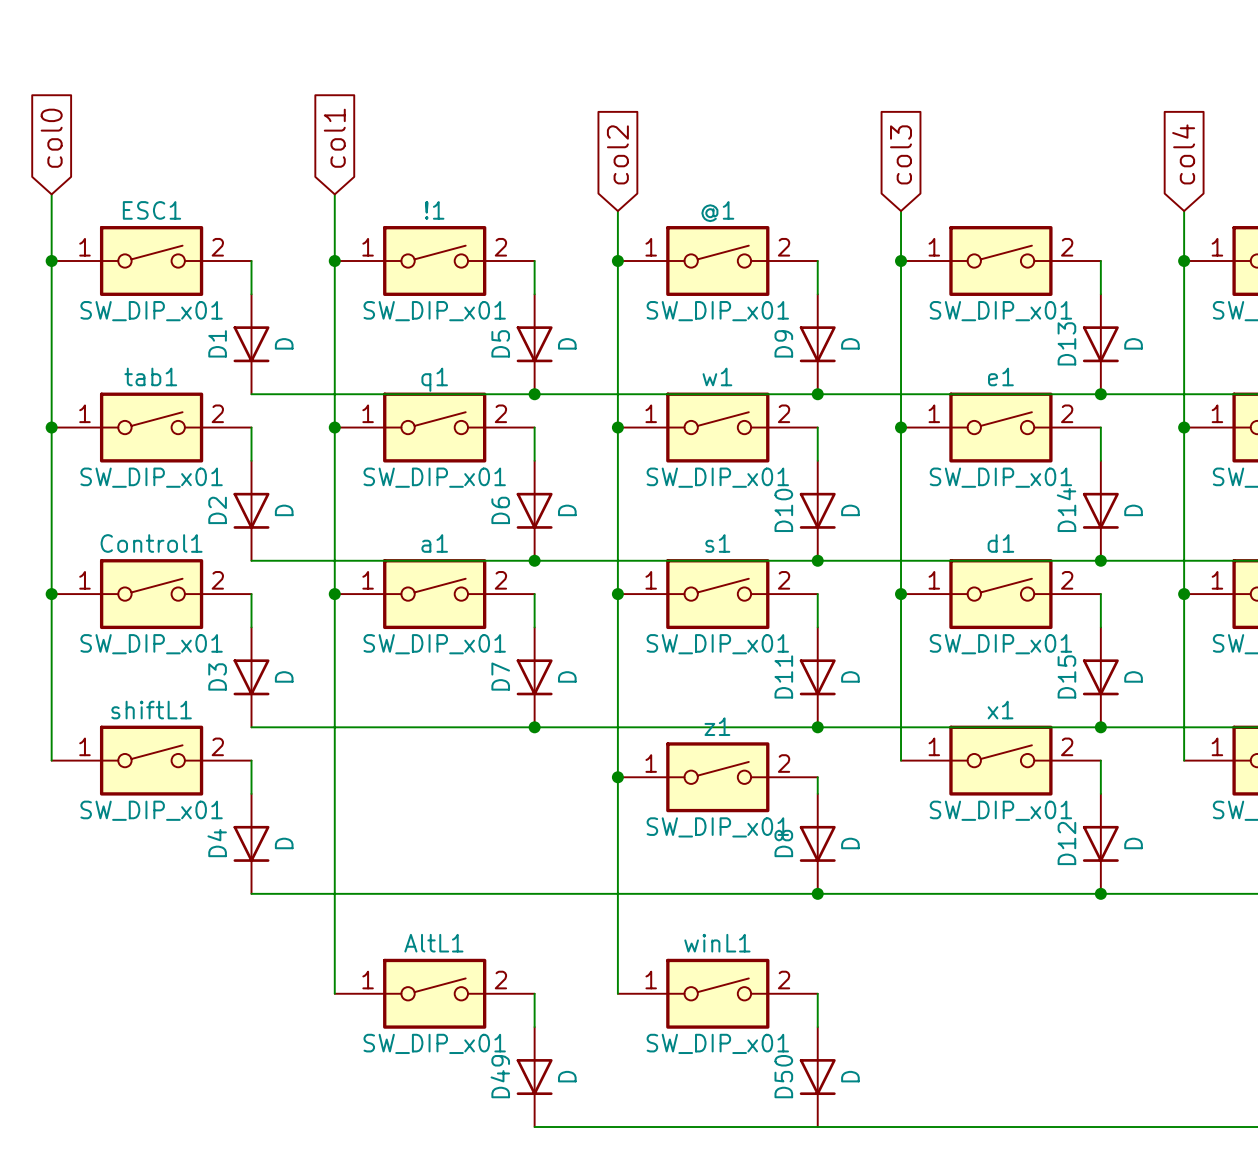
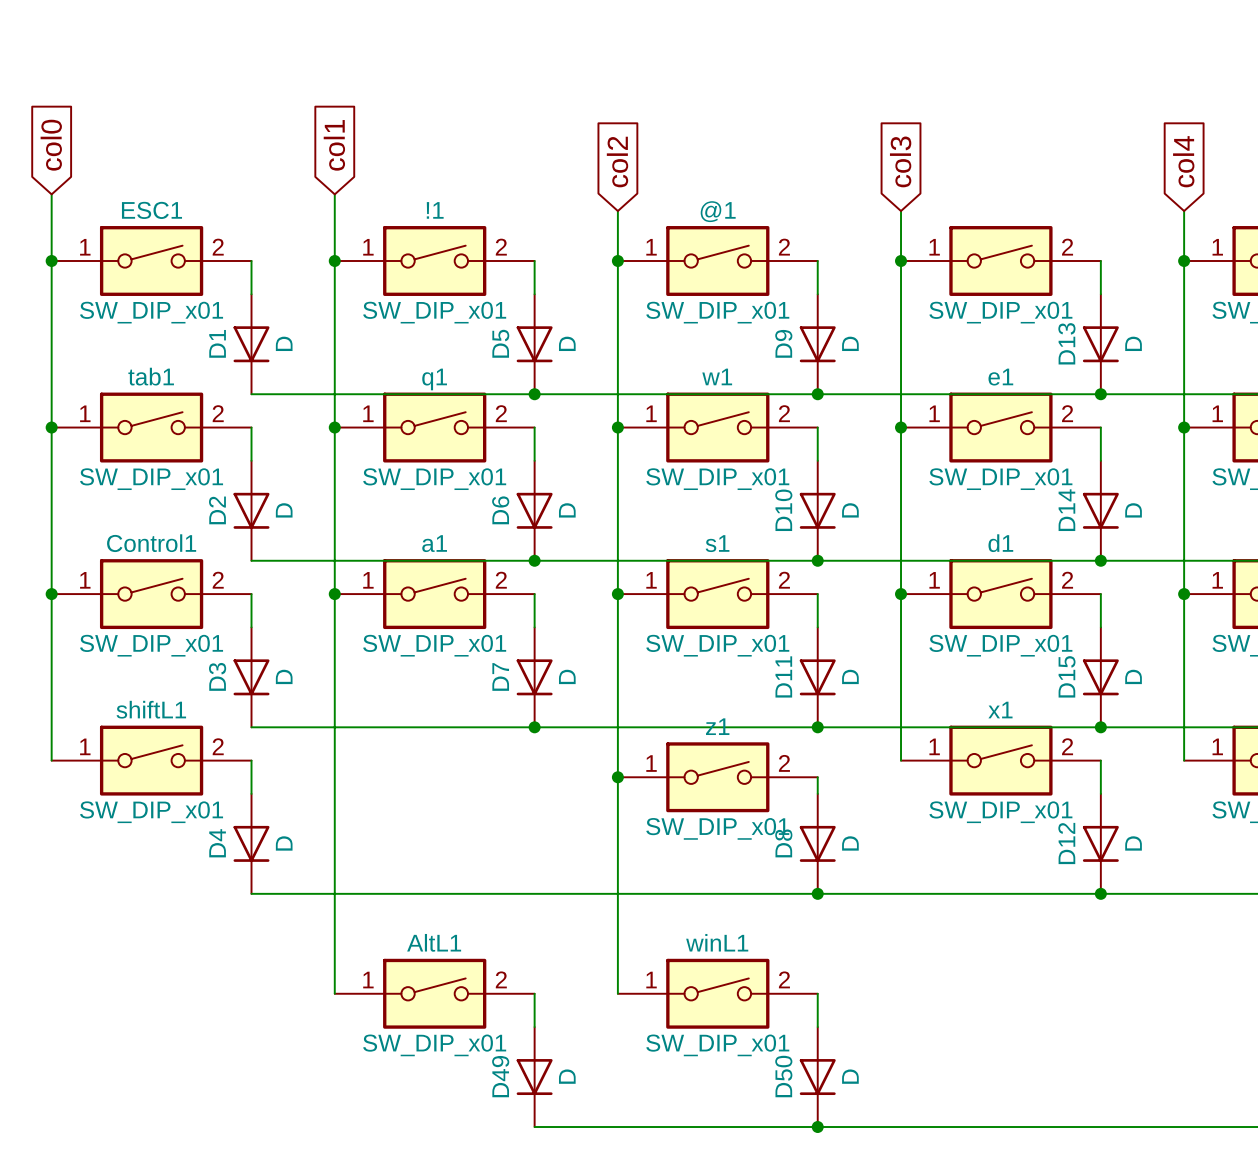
junction: none -> (817, 1127)

